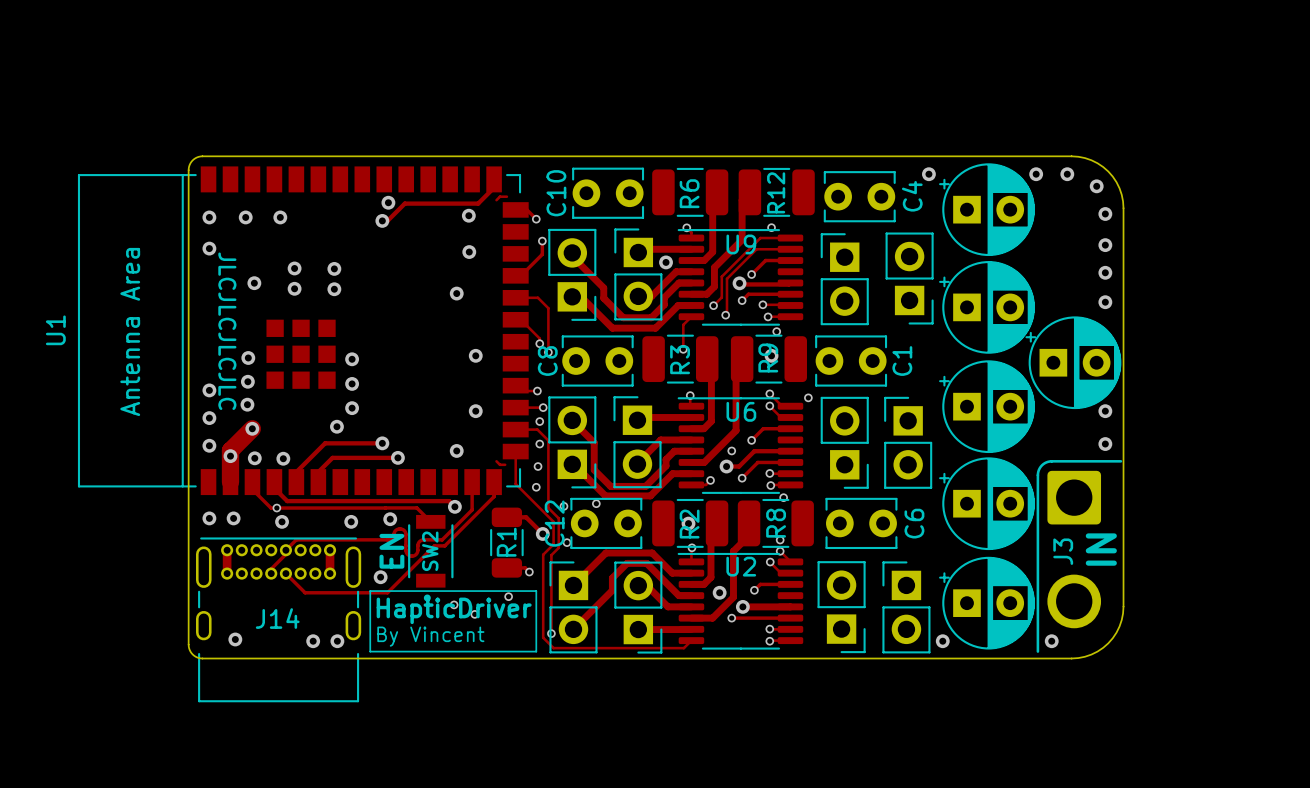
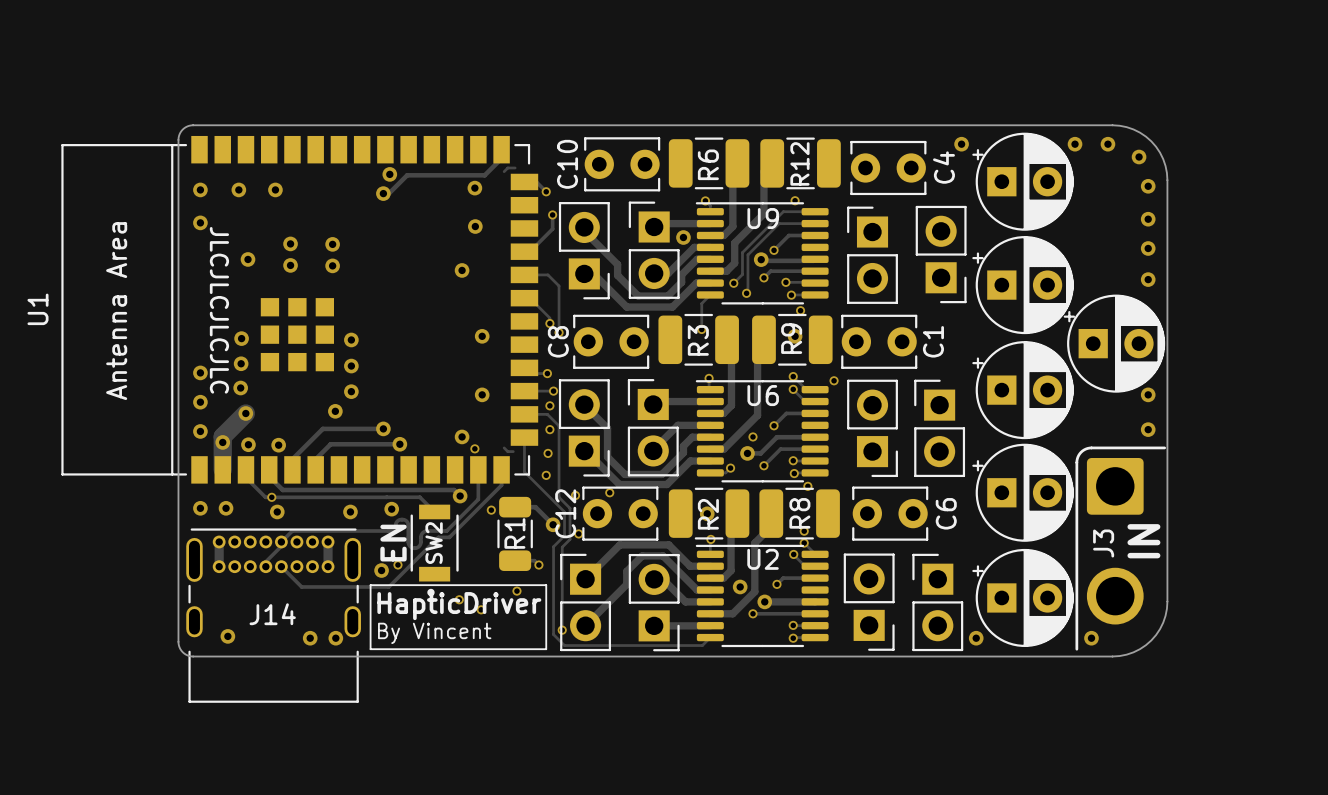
via: none -> (474, 448)
via: none -> (491, 510)
via: none -> (397, 564)

